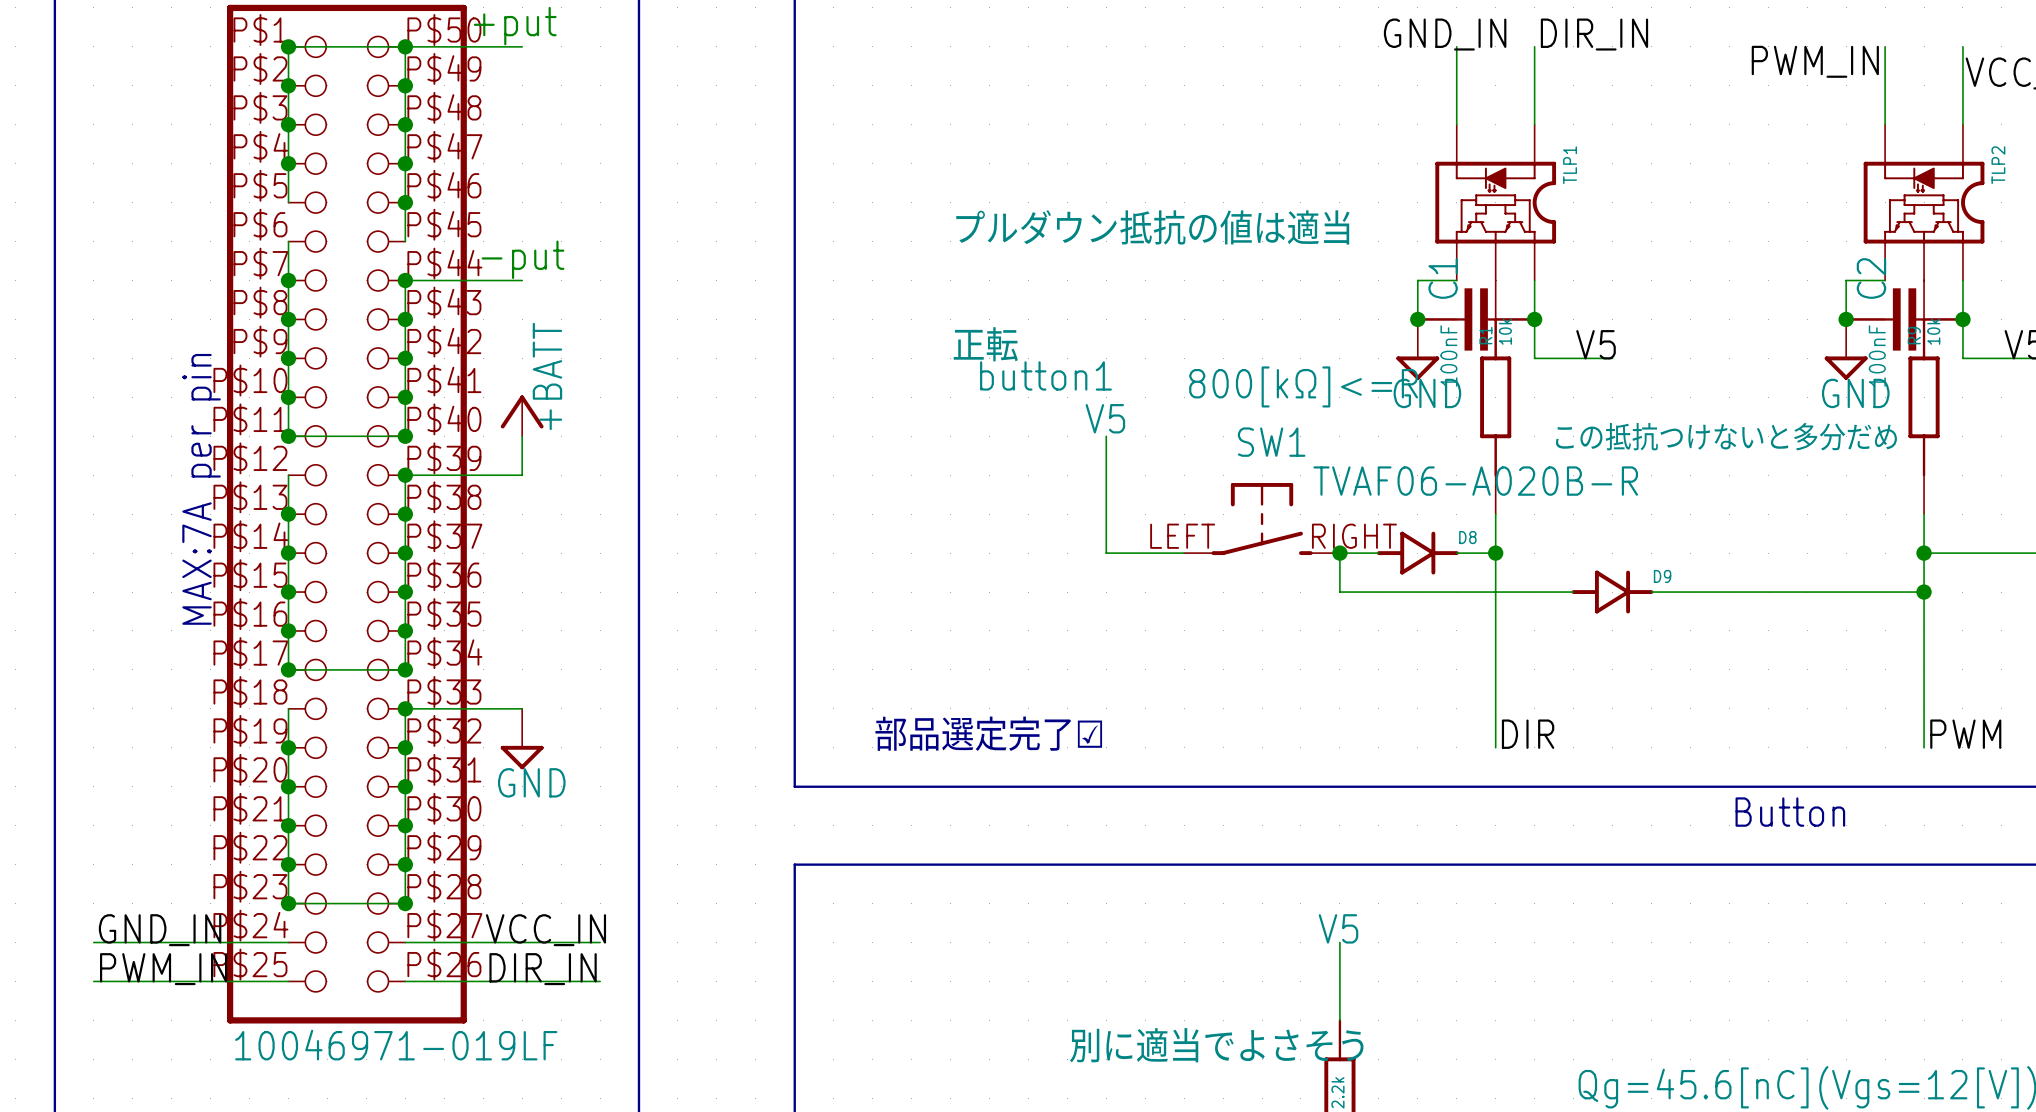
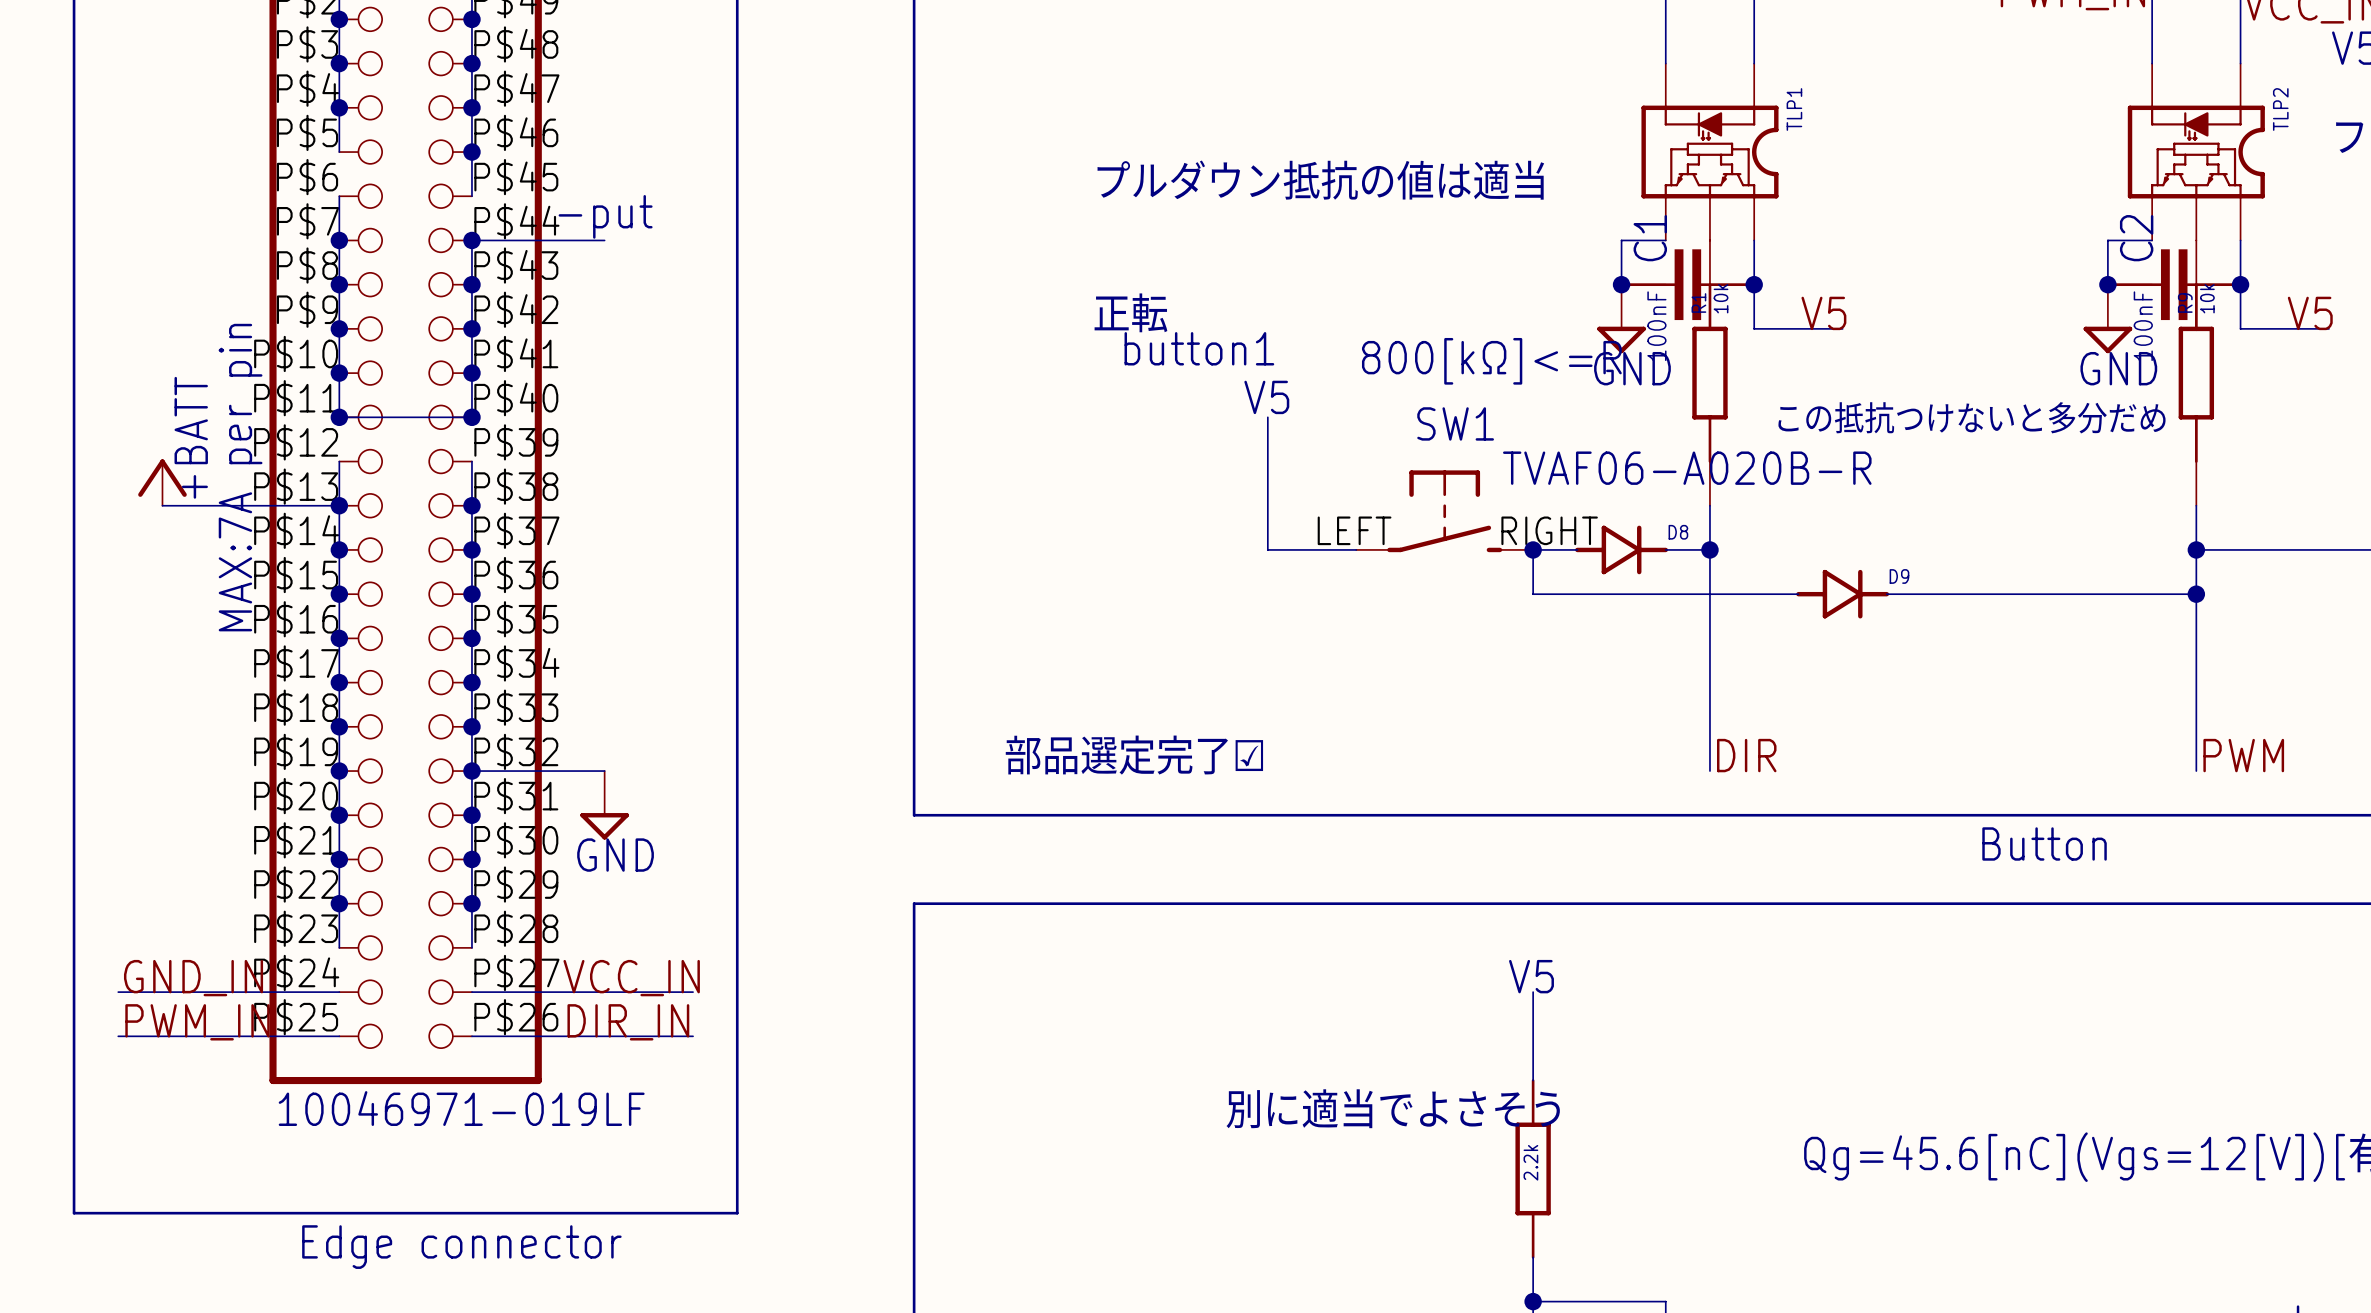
power symbol: +BATT (522, 415) -> none
wire: (522, 436) (522, 475) (405, 475) -> none
junction: (405, 475) -> none
power symbol: none -> +BATT (162, 482)
wire: none -> (162, 505) (339, 505)
wire: (288, 669) (405, 669) -> (339, 682) (339, 726)
junction: none -> (339, 726)
wire: (405, 708) (522, 708) -> (471, 726) (471, 682)
power symbol position: GND (522, 739) -> GND (604, 805)
wire: (288, 903) (405, 903) -> (471, 771) (604, 771)
junction: (288, 903) -> none
junction: (405, 903) -> none

